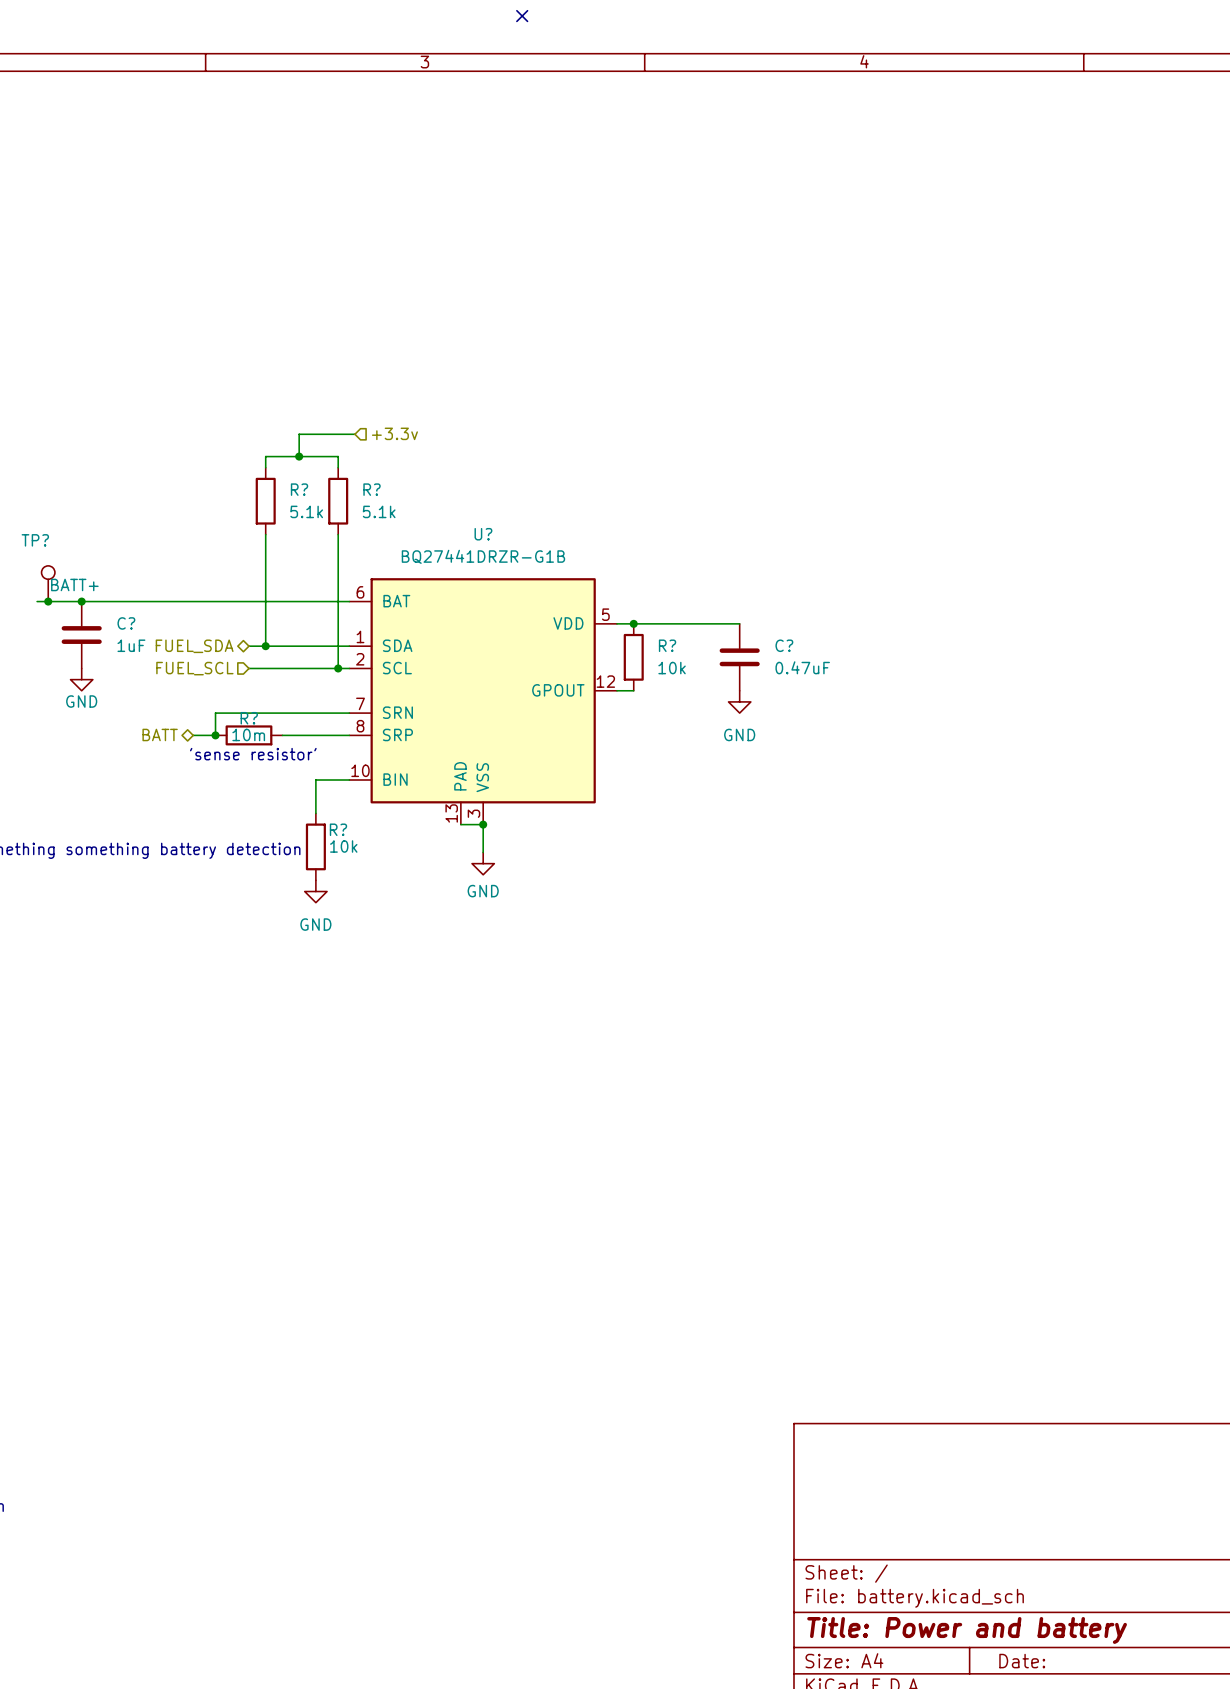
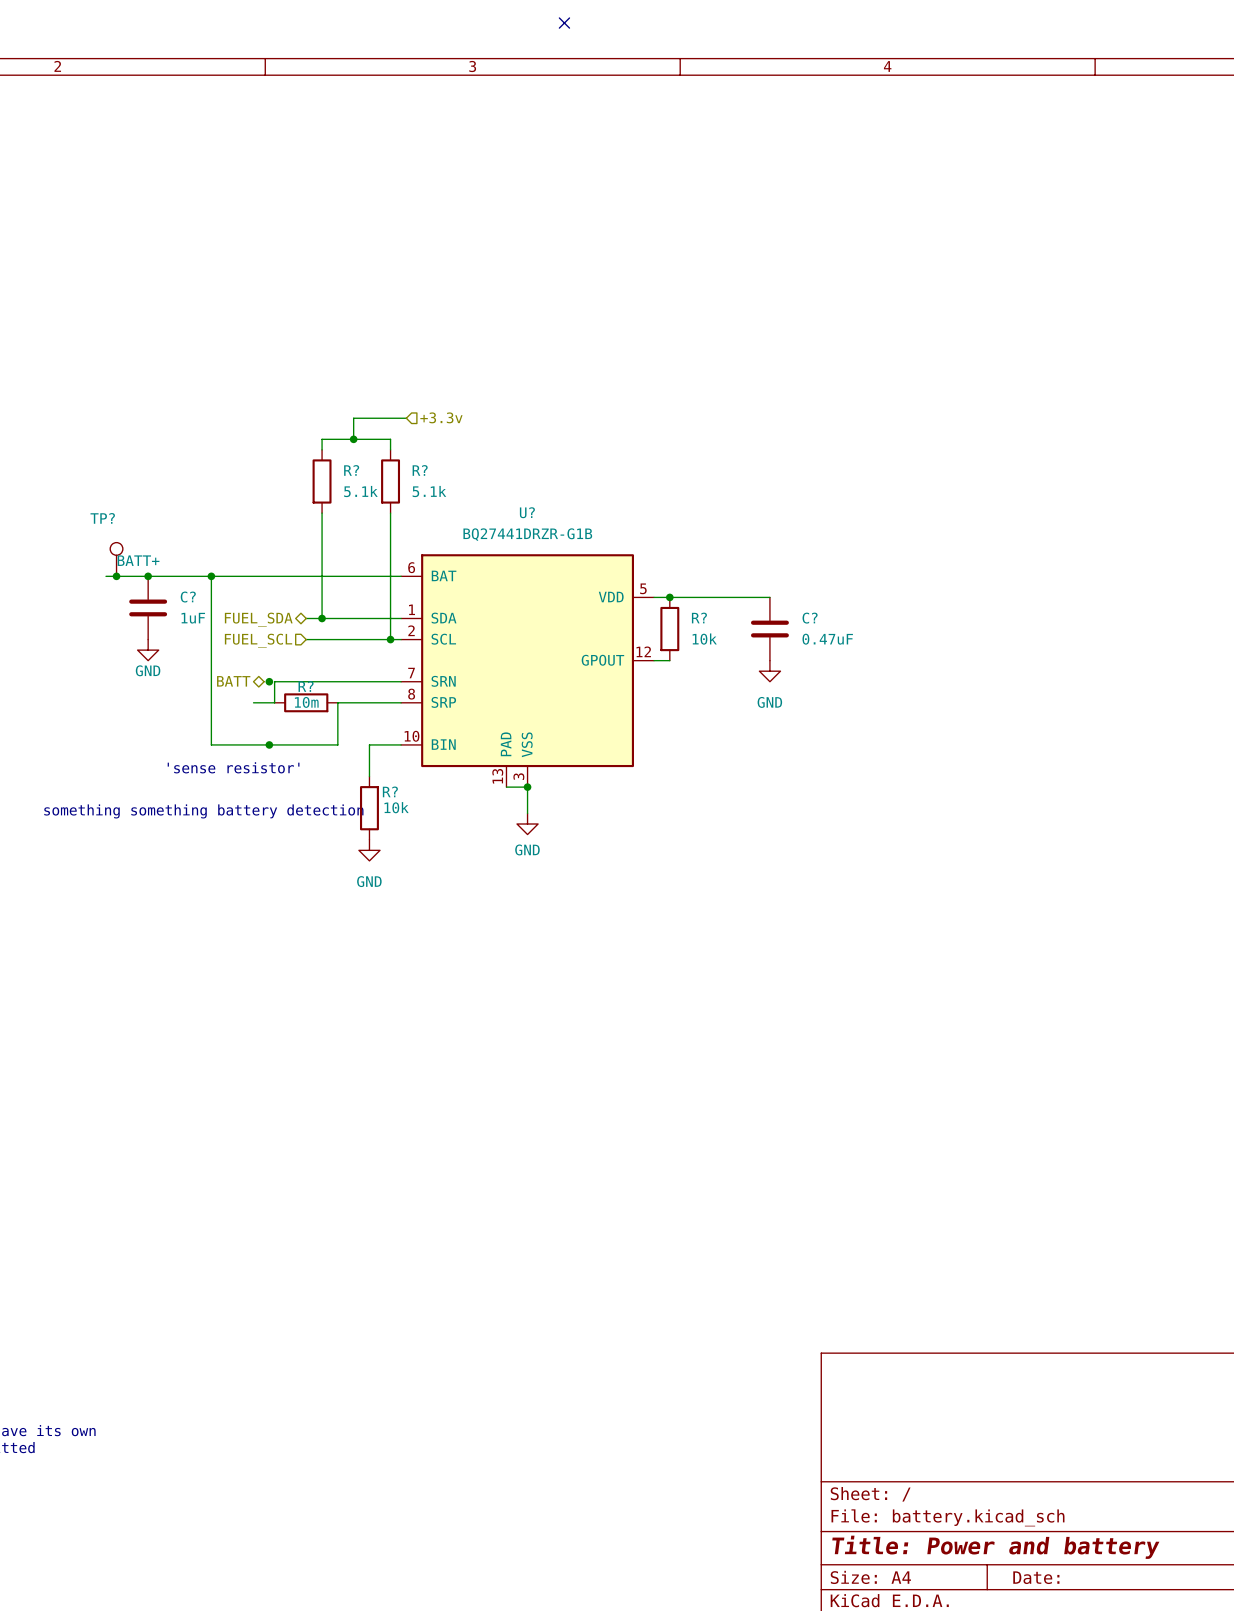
wire: none -> (211, 576) (211, 744) (337, 744) (337, 702)
junction: none -> (211, 576)
junction: none -> (269, 681)
hierarchical label position: BATT (160, 734) -> BATT (233, 681)
junction: (215, 735) -> none
text position: 'sense resistor' (253, 754) -> 'sense resistor' (233, 767)
junction: none -> (269, 744)

